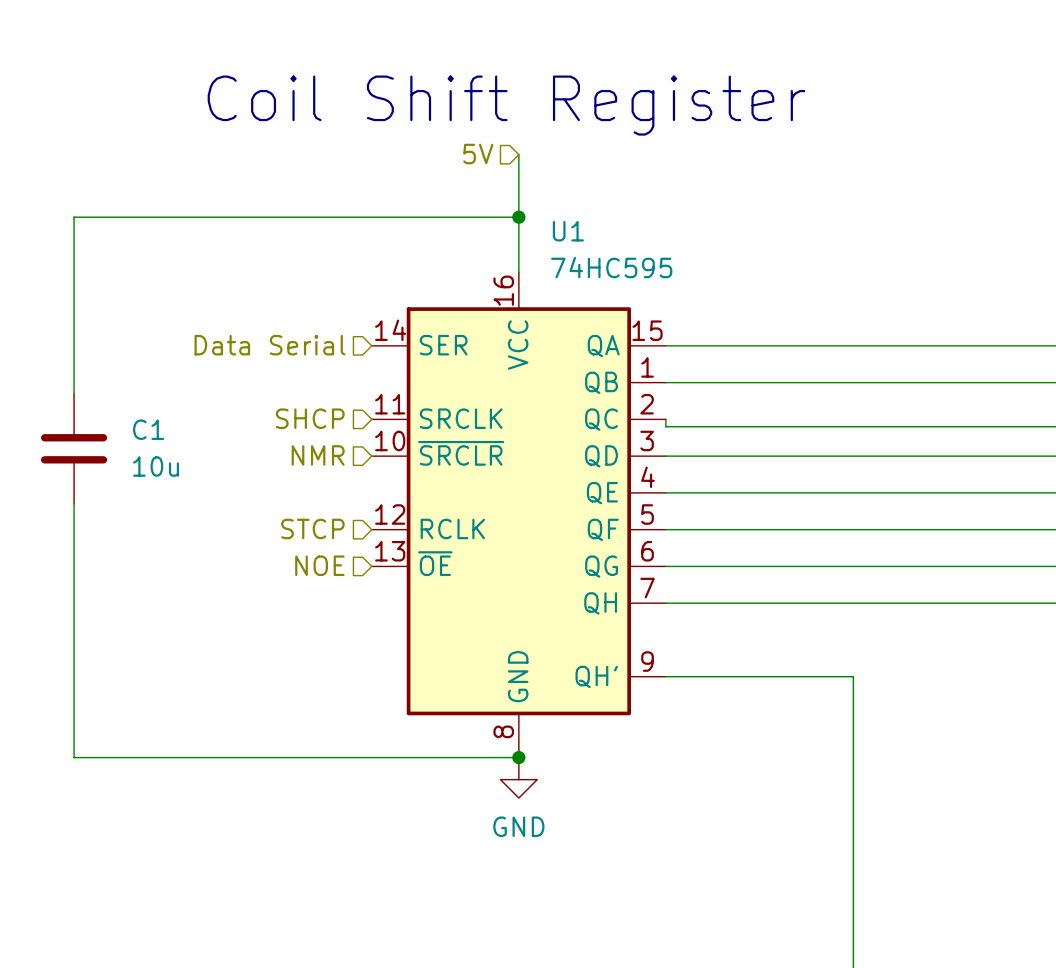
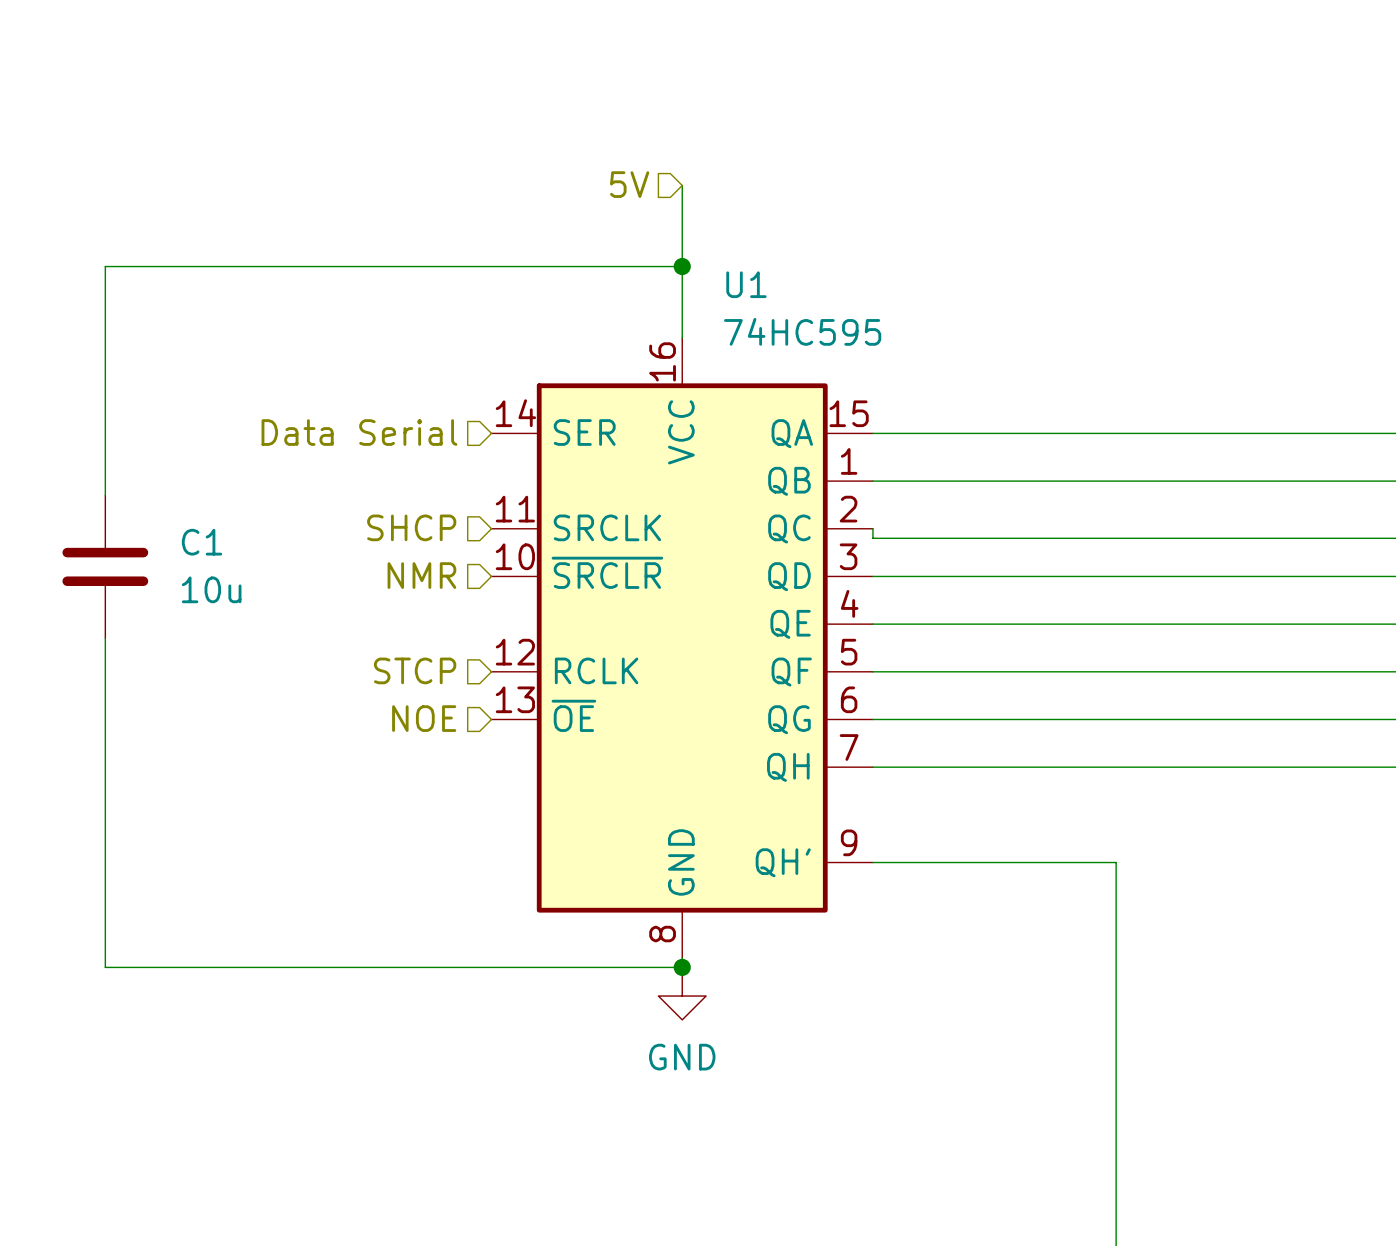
text: Coil Shift Register (506, 105) -> none

